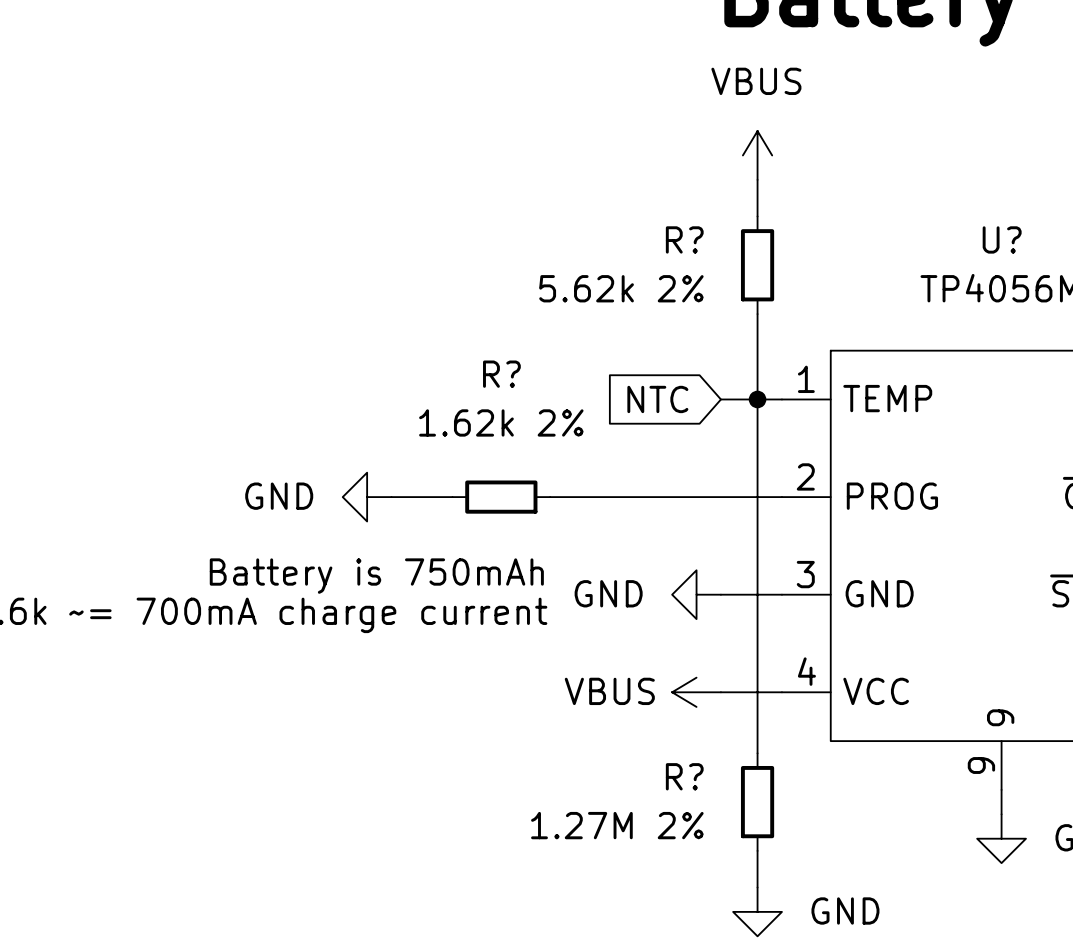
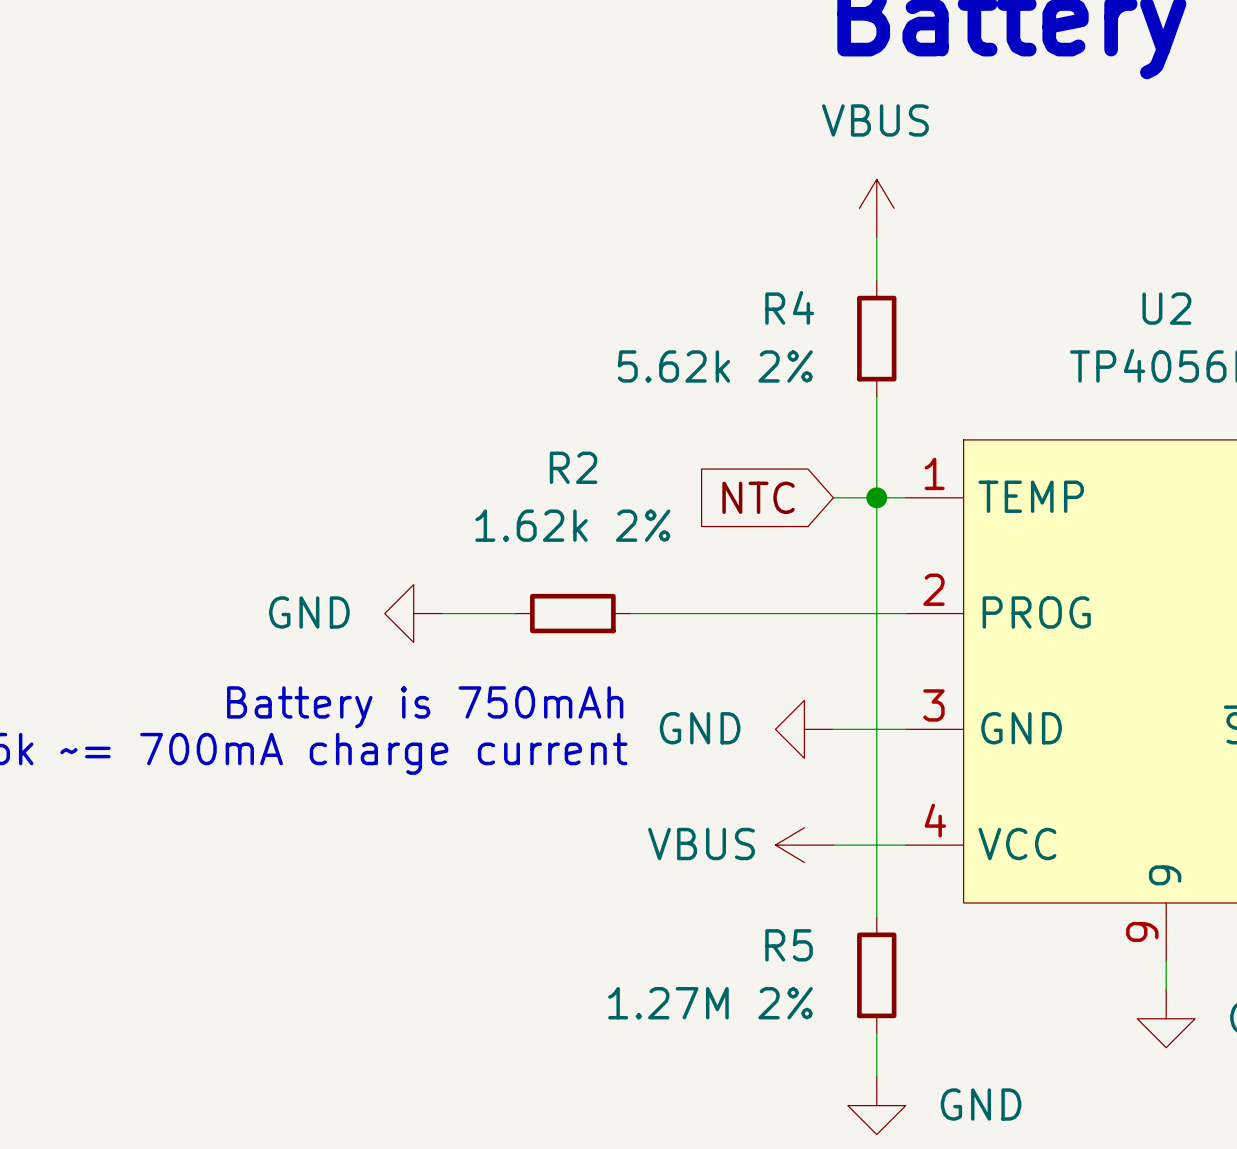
R? name: R? (684, 239) -> R4 (789, 307)
U? name: U? (1002, 239) -> U2 (1166, 308)
R? name: R? (501, 374) -> R2 (573, 467)
R? name: R? (684, 776) -> R5 (789, 945)

